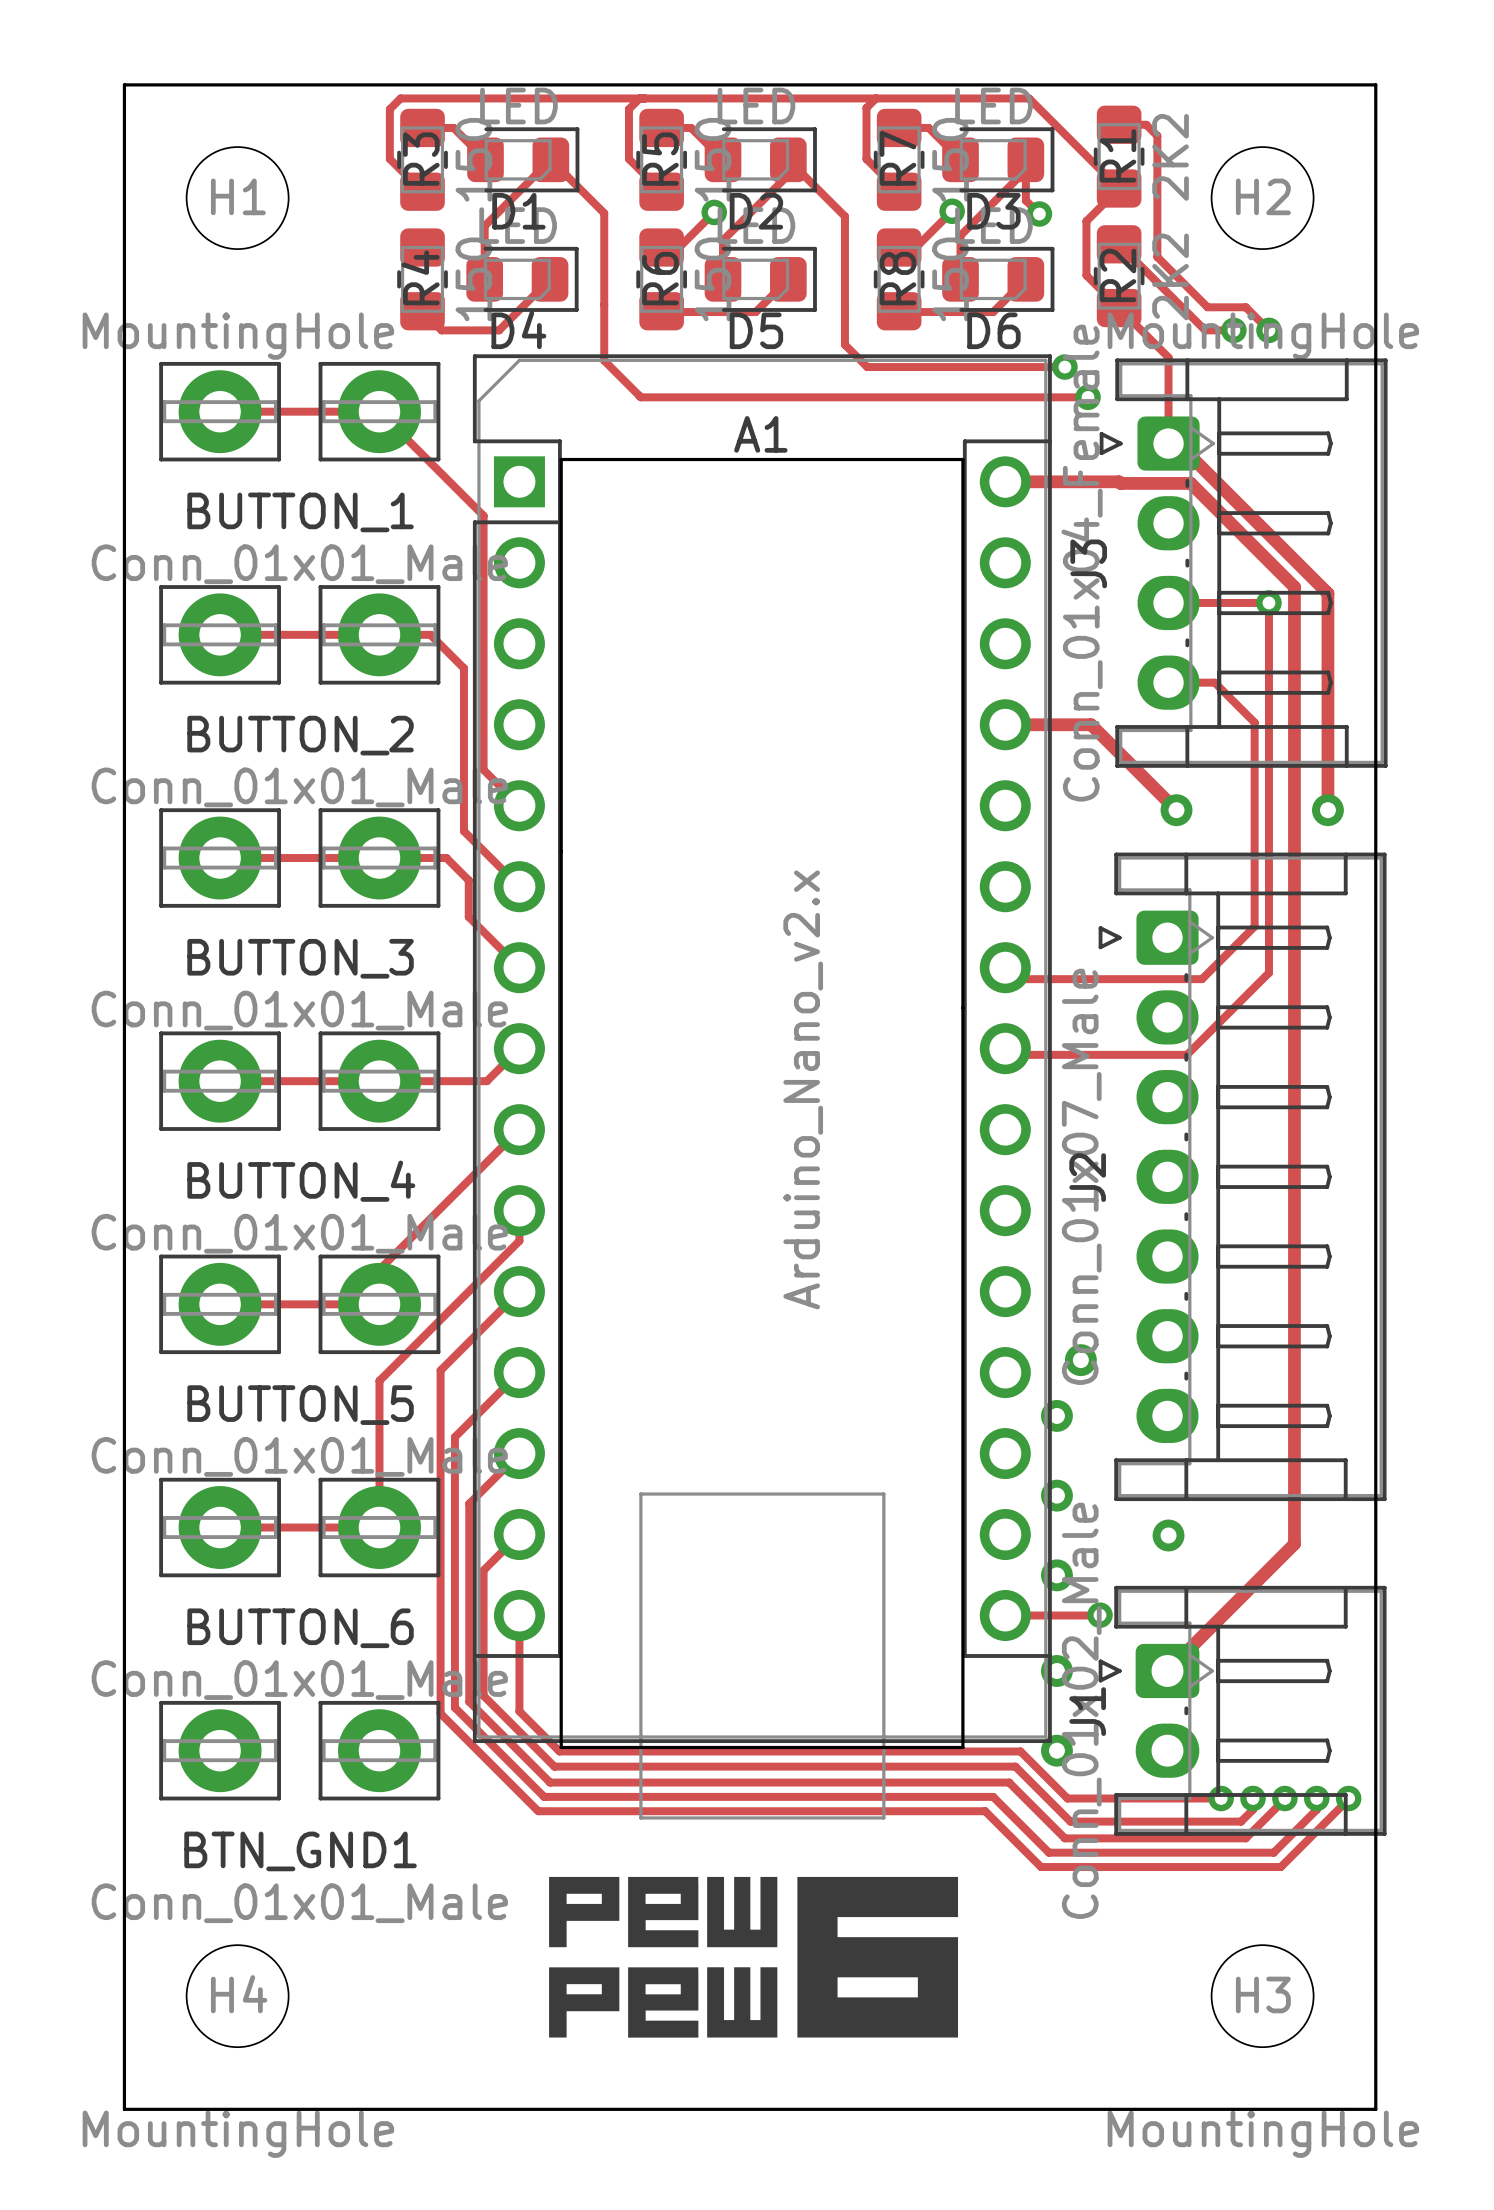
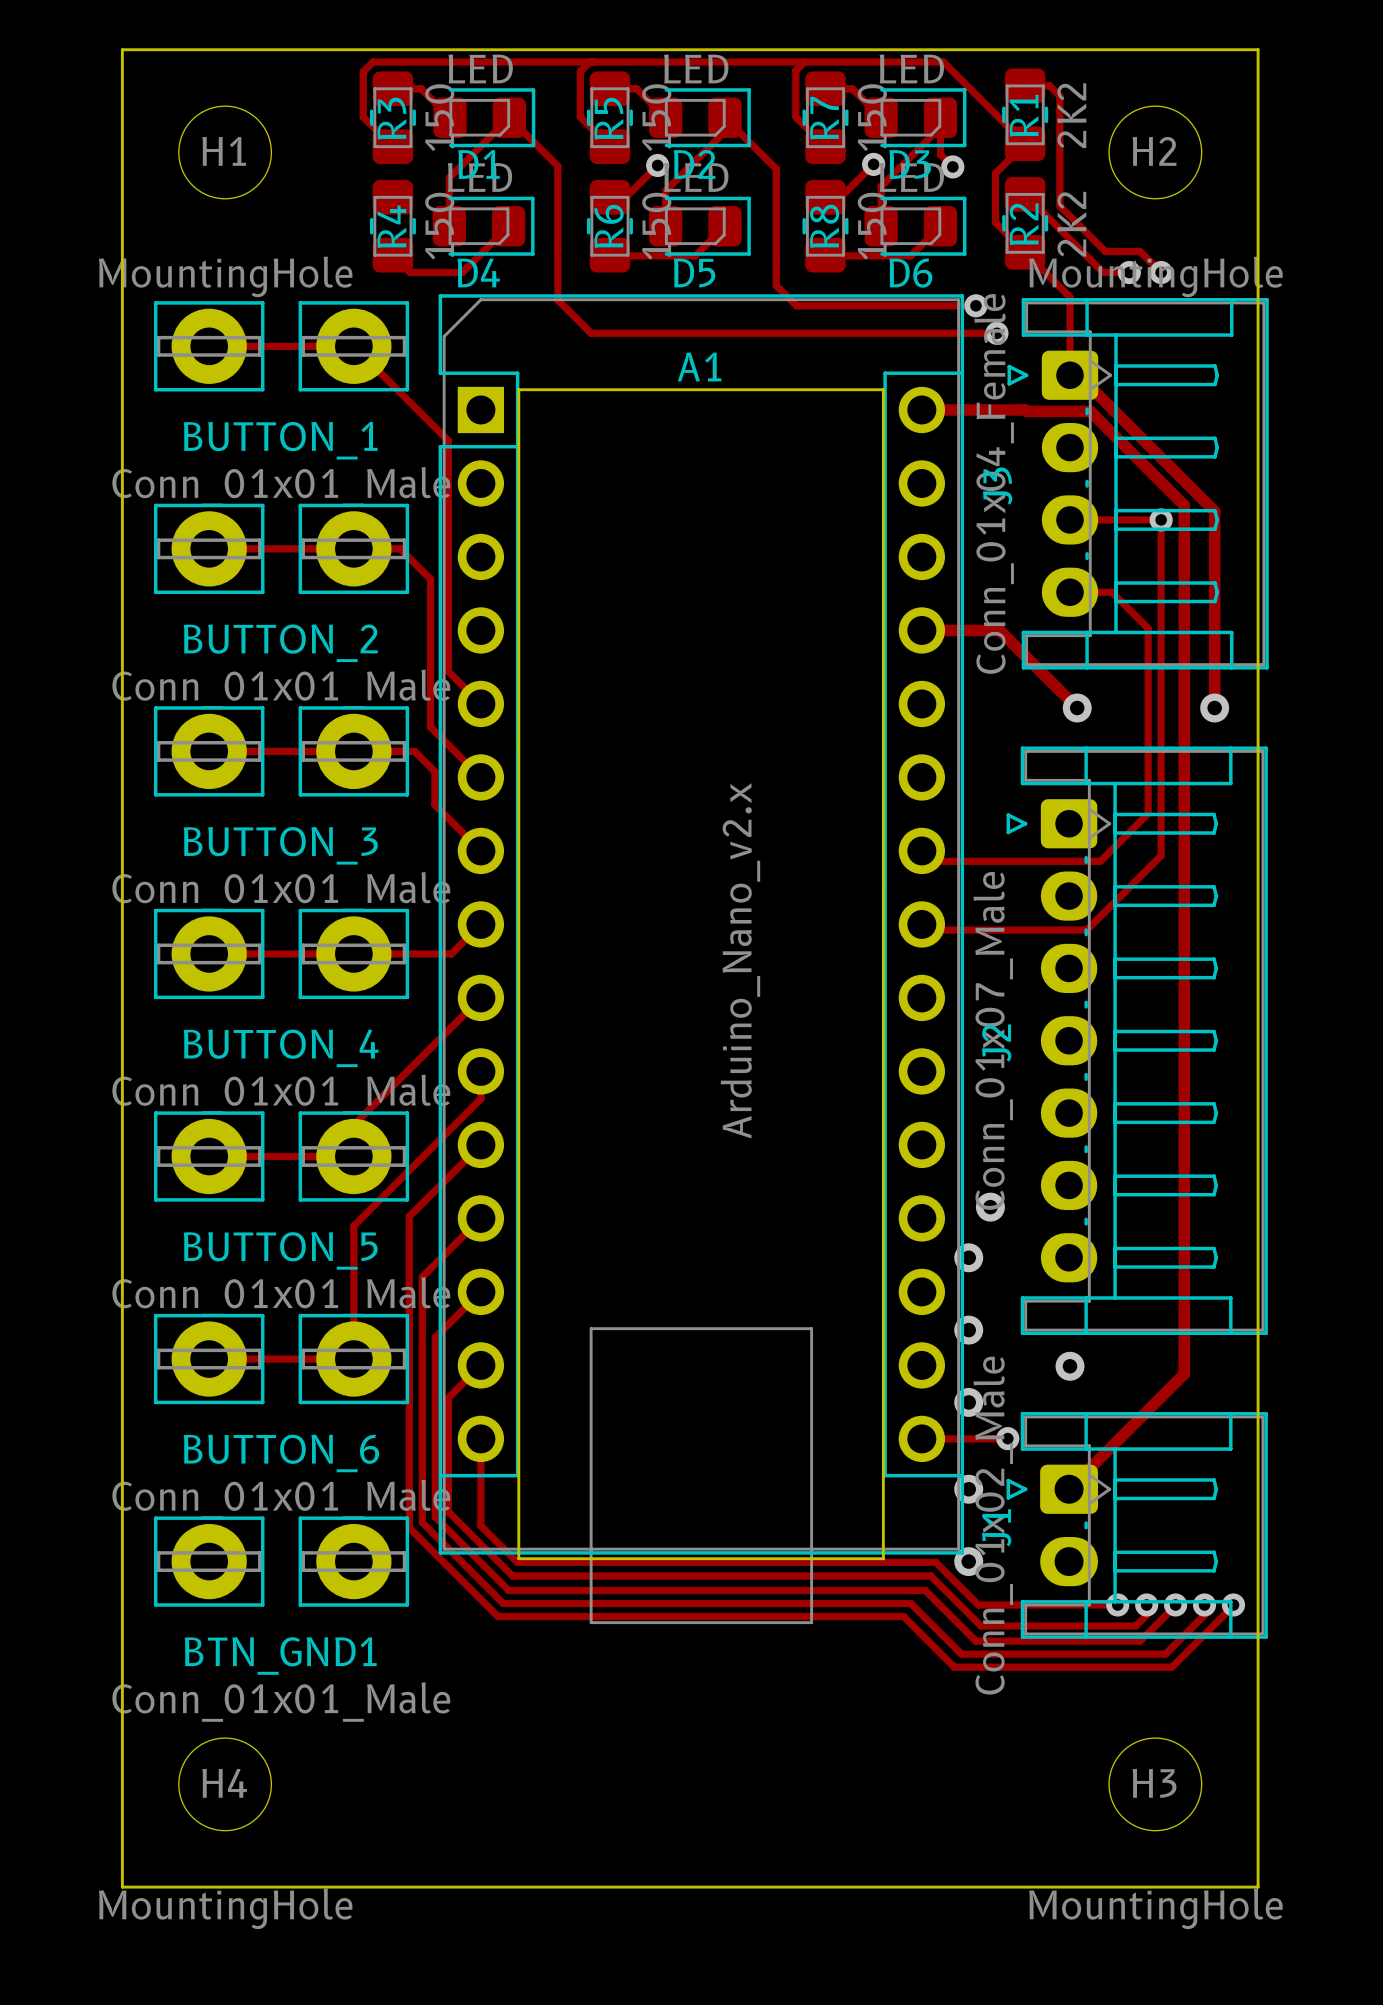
drawing: [549, 1876, 959, 2038] -> none

